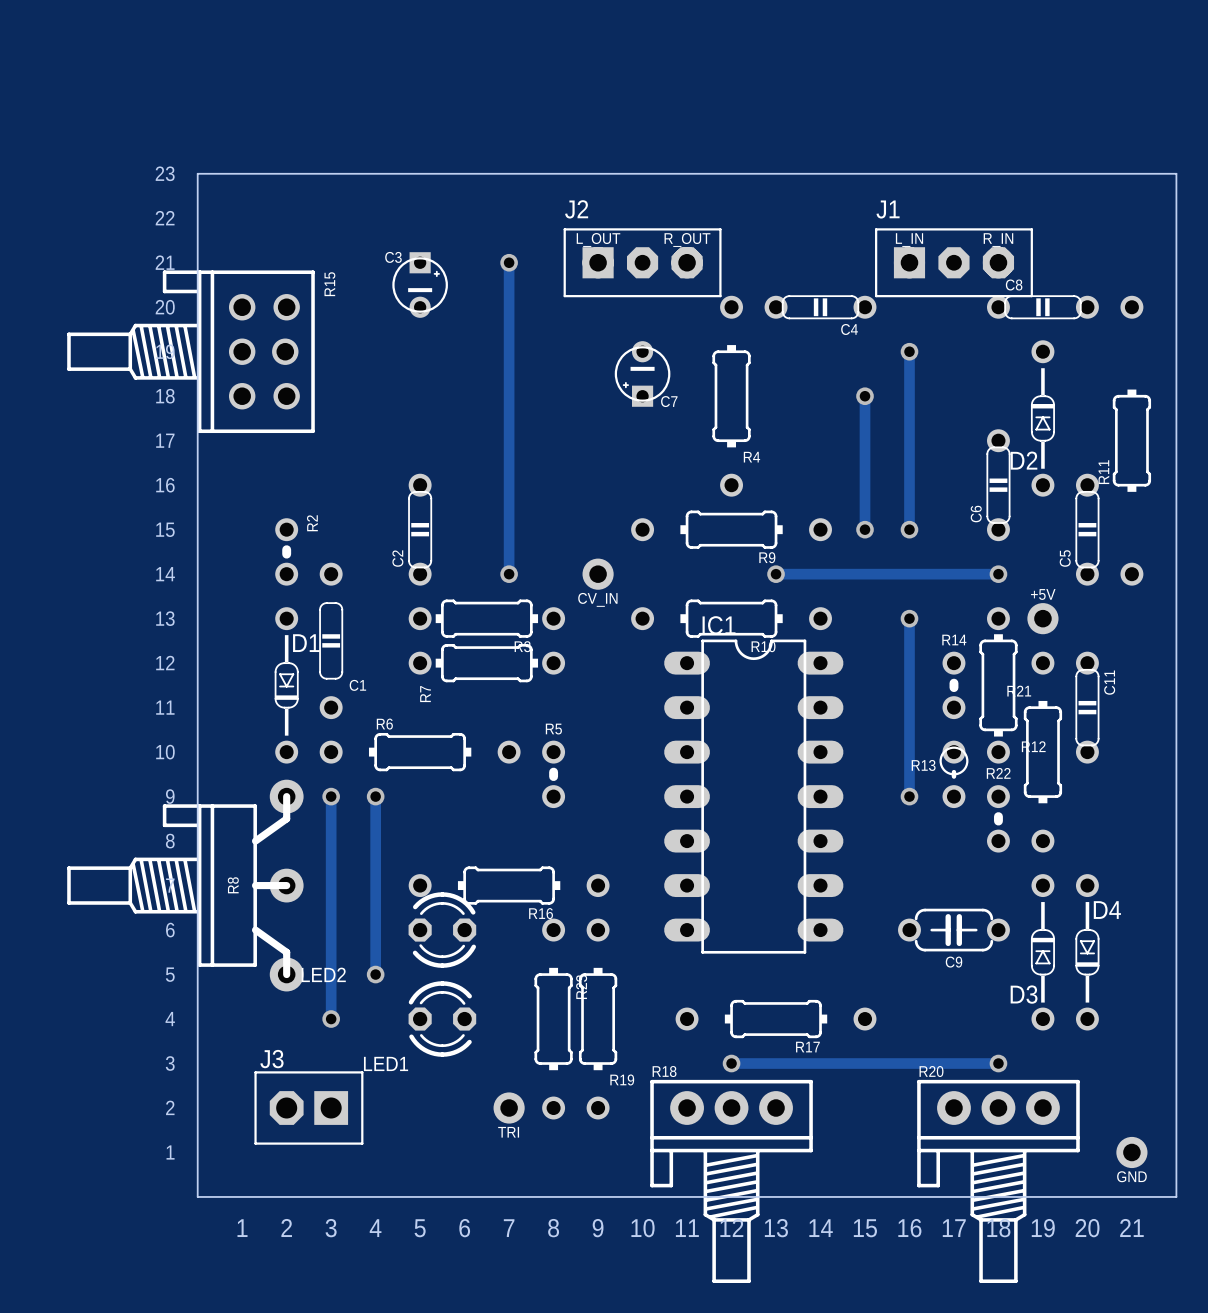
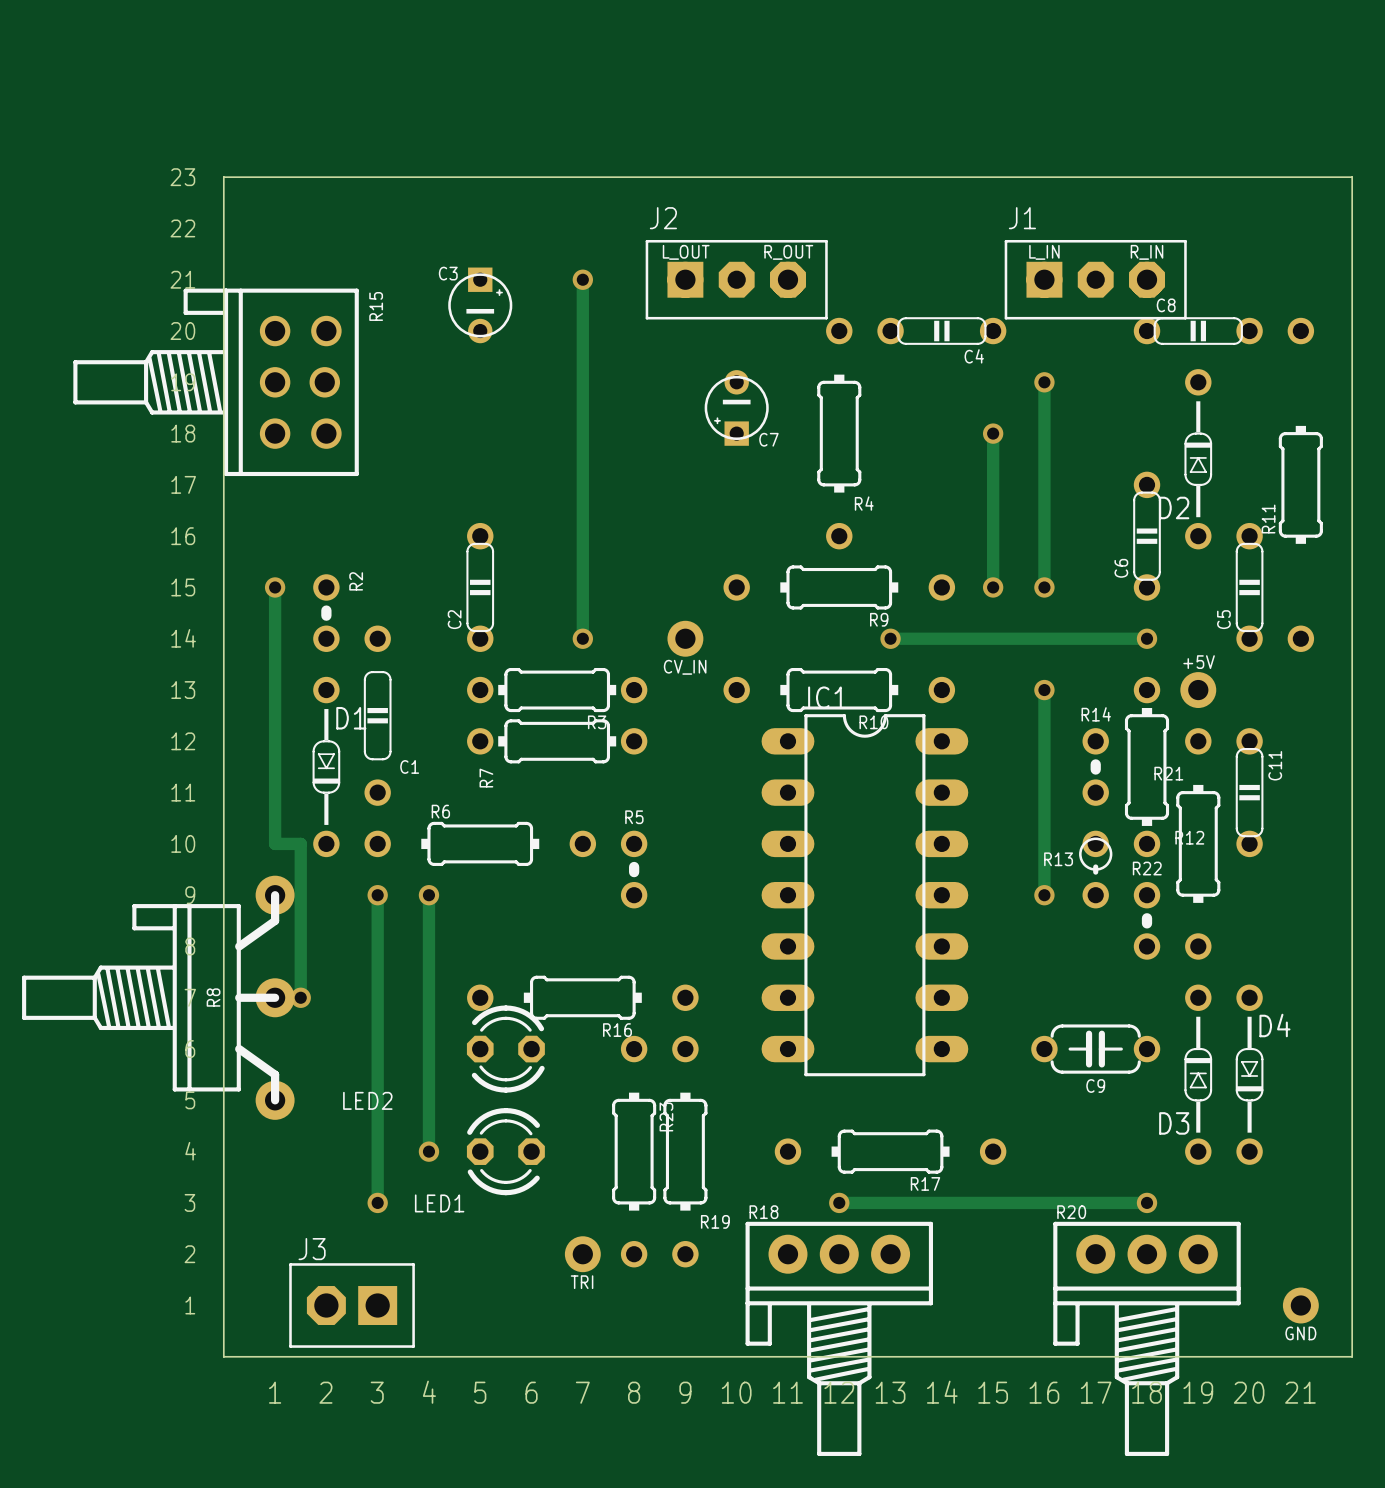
track: none -> (275, 587) (275, 843) (300, 843) (300, 997)
via: none -> (275, 587)
R8 position: (185, 885) -> (158, 997)
via: none -> (300, 997)
track: none -> (428, 1100) (428, 1151)
via: (375, 974) -> none
track: none -> (377, 1151) (377, 1202)
via: (331, 1019) -> none
via: none -> (428, 1151)
via: none -> (377, 1202)
J3 position: (308, 1108) -> (352, 1305)

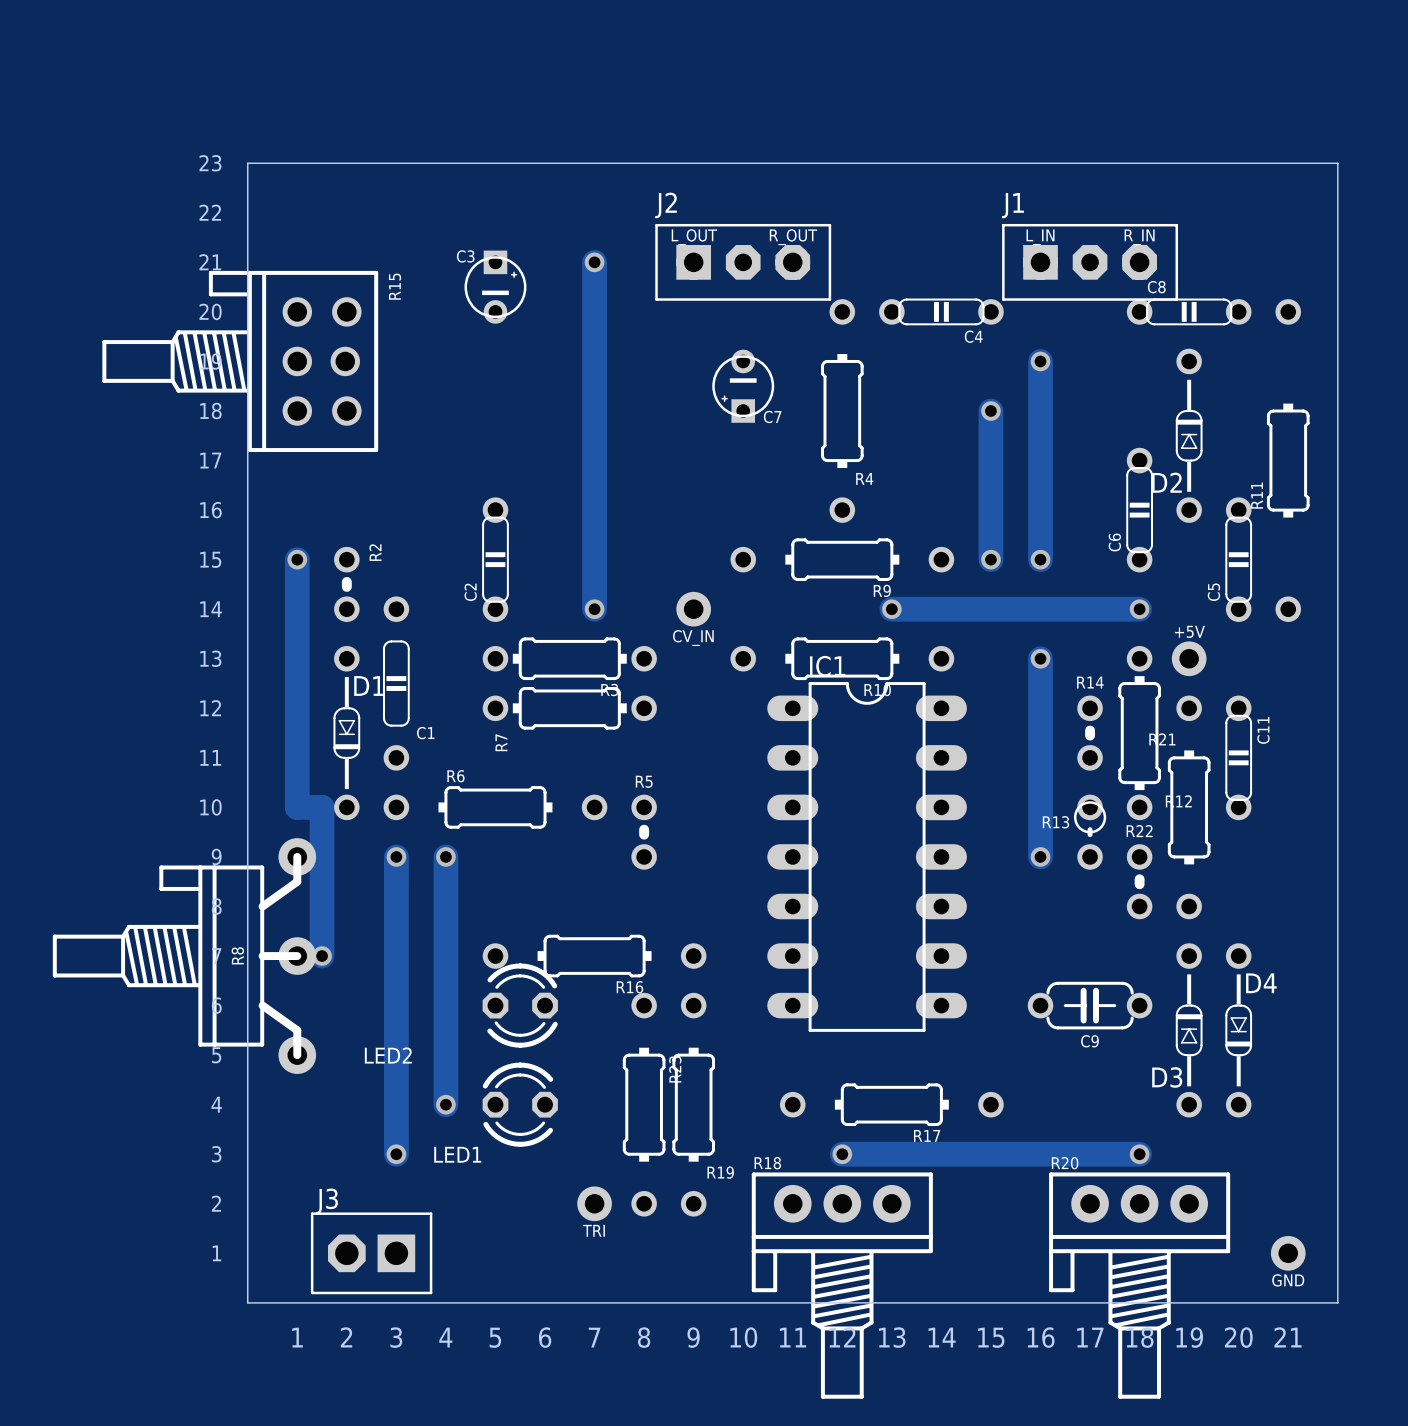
track width: thin (582, 279) (582, 638) -> thick (594, 262) (594, 609)
track width: thin (1044, 382) (1044, 587) -> thick (1040, 361) (1040, 559)
track width: thin (993, 433) (993, 587) -> thick (990, 411) (990, 559)
track width: thin (275, 587) (275, 843) (300, 843) (300, 997) -> thick (297, 559) (297, 807) (322, 807) (322, 956)
track width: thin (890, 638) (1147, 638) -> thick (891, 609) (1139, 609)
track width: thin (1044, 690) (1044, 895) -> thick (1040, 658) (1040, 856)
track width: thin (377, 895) (377, 1202) -> thick (396, 856) (396, 1154)
track width: thin (428, 895) (428, 1151) -> thick (445, 856) (445, 1104)
track width: thin (839, 1202) (1147, 1202) -> thick (842, 1154) (1139, 1154)

